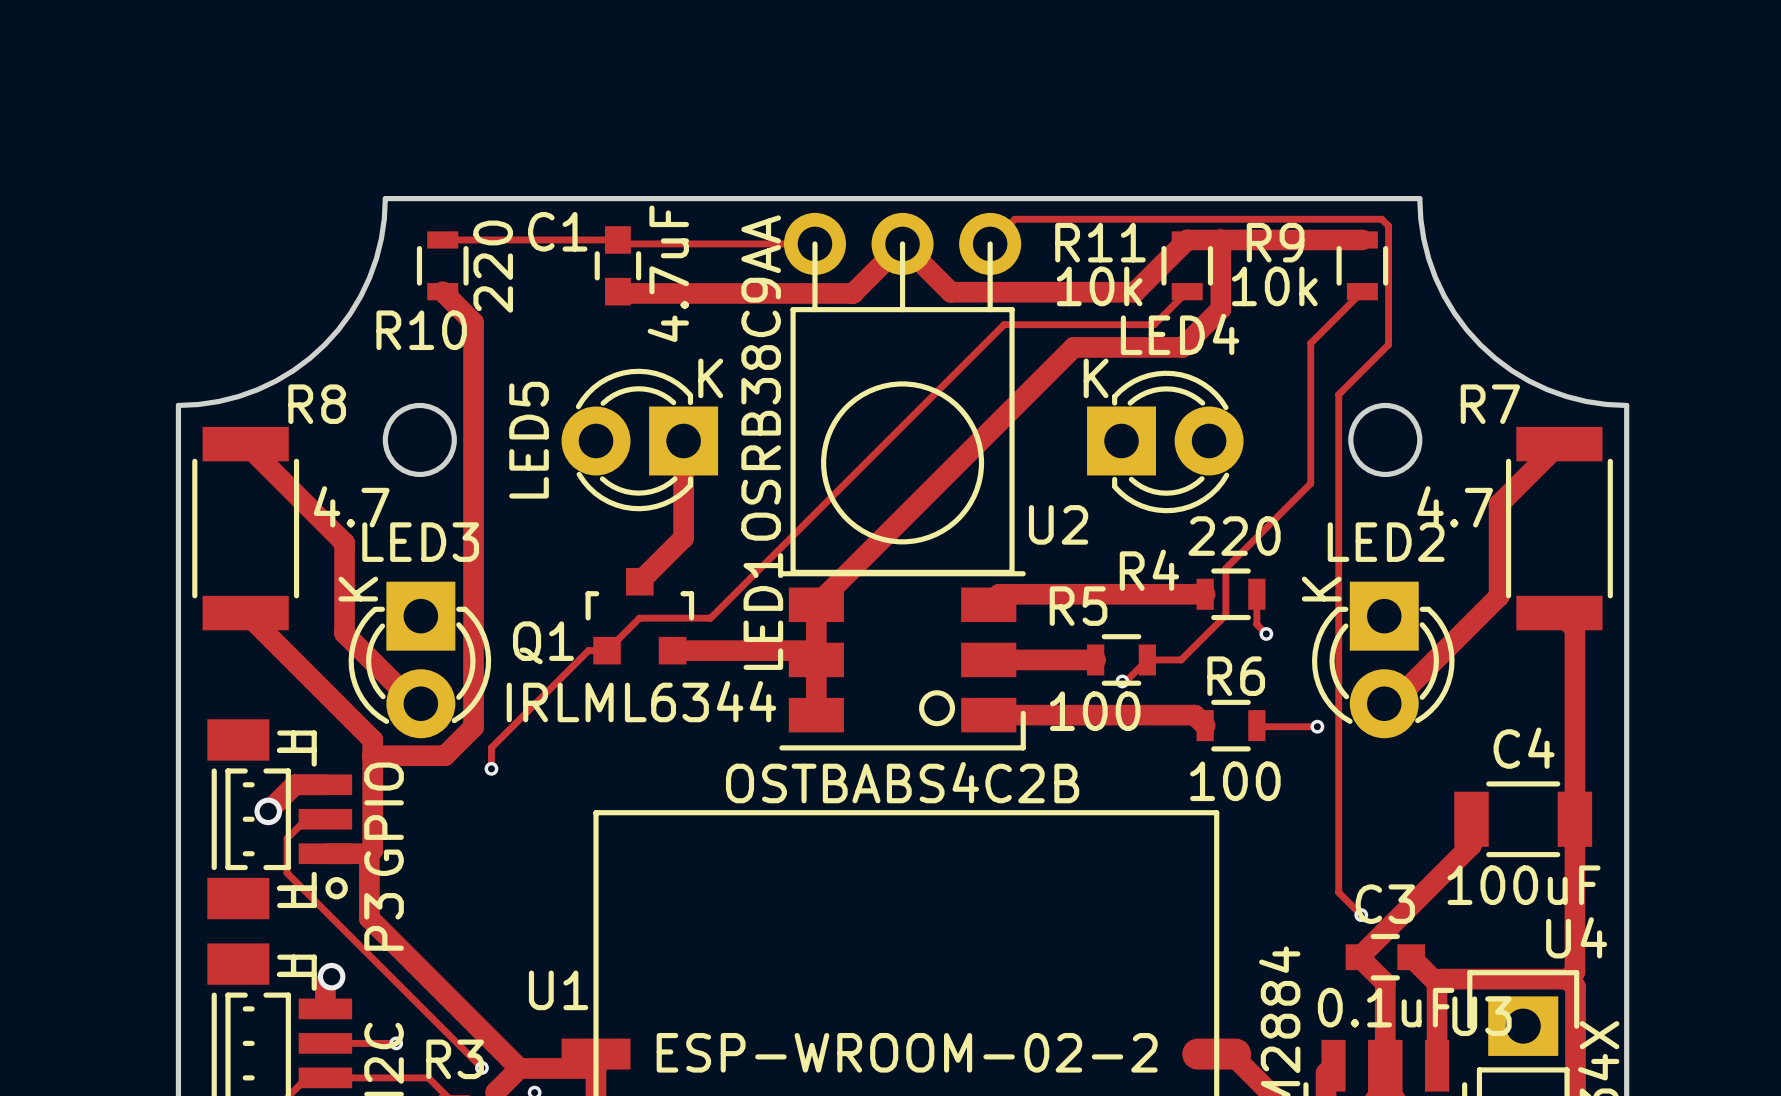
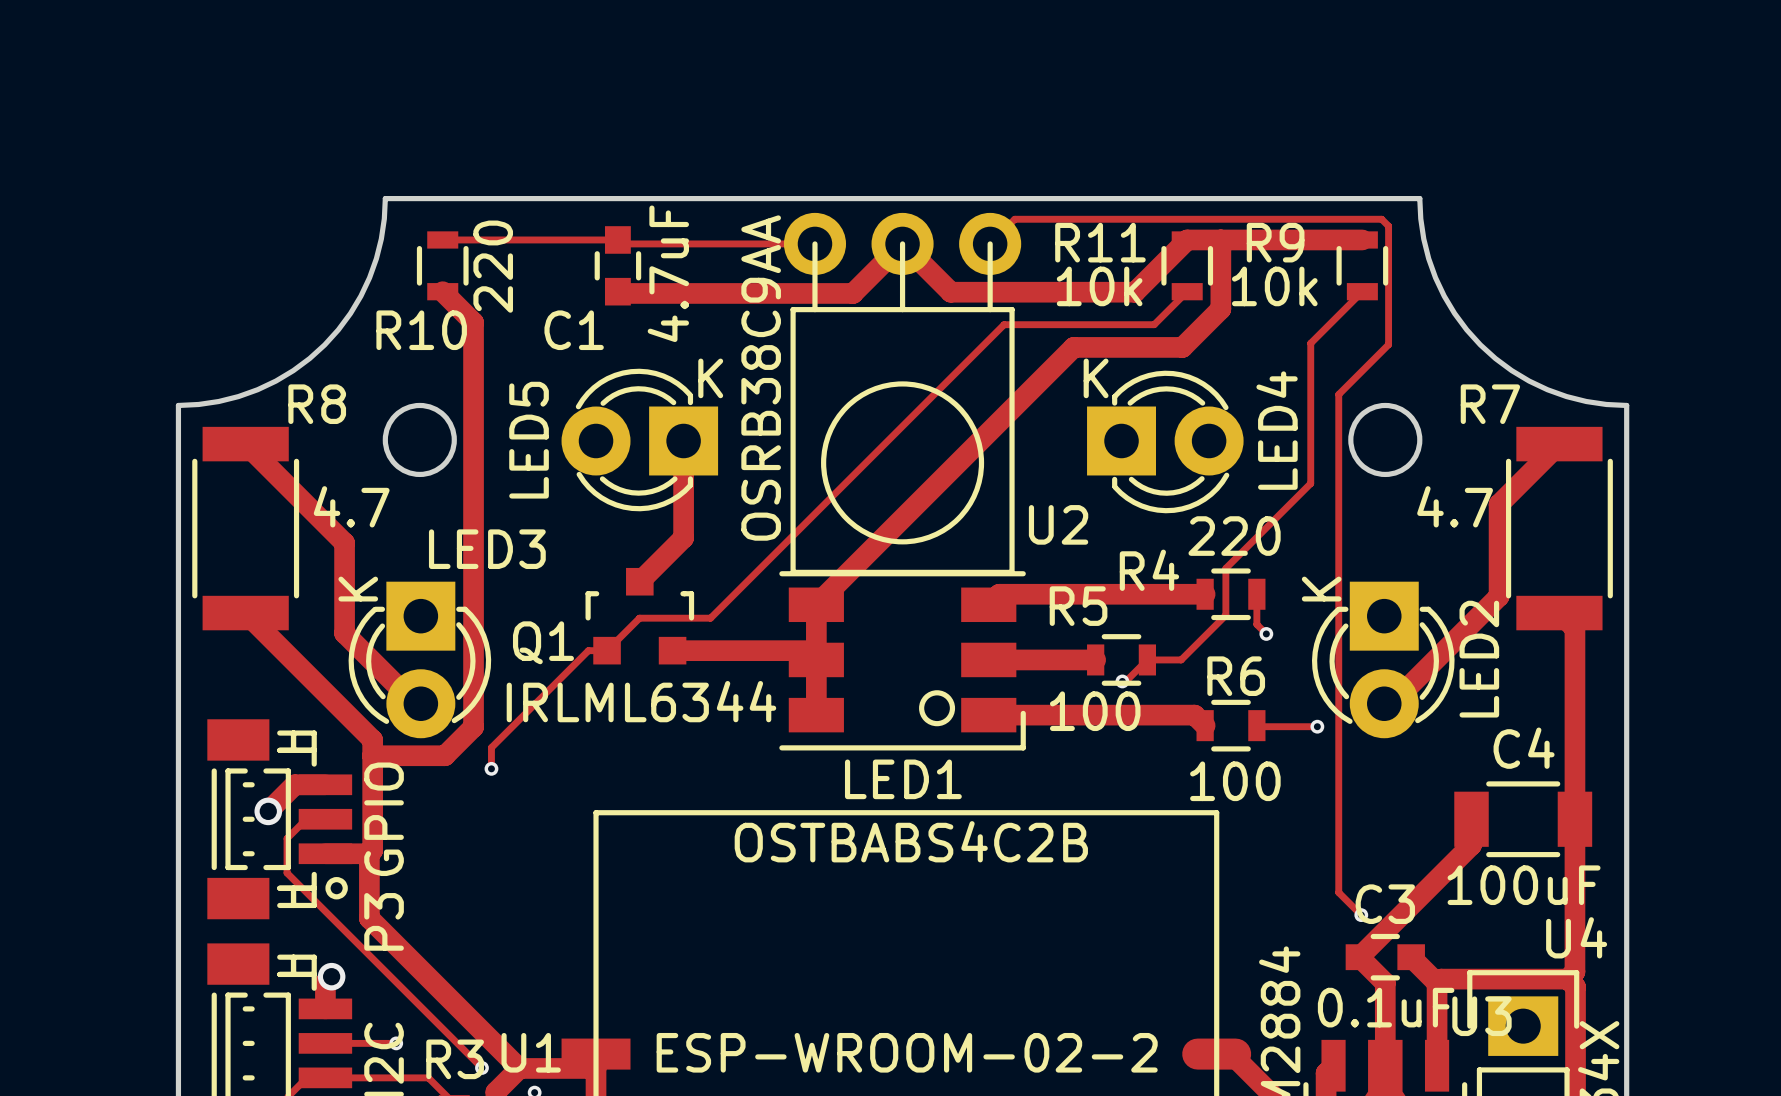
C1 name position: C1 (557, 231) -> C1 (574, 330)
LED4 name rotation: 0° (1180, 334) -> 90° counterclockwise (1277, 430)
LED3 name position: LED3 (420, 542) -> LED3 (487, 549)
LED2 name rotation: 0° (1386, 542) -> 90° counterclockwise (1479, 659)
LED1 name rotation: 0° (763, 611) -> 90° clockwise (903, 779)
LED1 name position: LED1 (763, 611) -> LED1 (903, 779)
LED1 value position: OSTBABS4C2B (902, 782) -> OSTBABS4C2B (911, 841)
U1 name position: U1 (558, 990) -> U1 (531, 1052)

